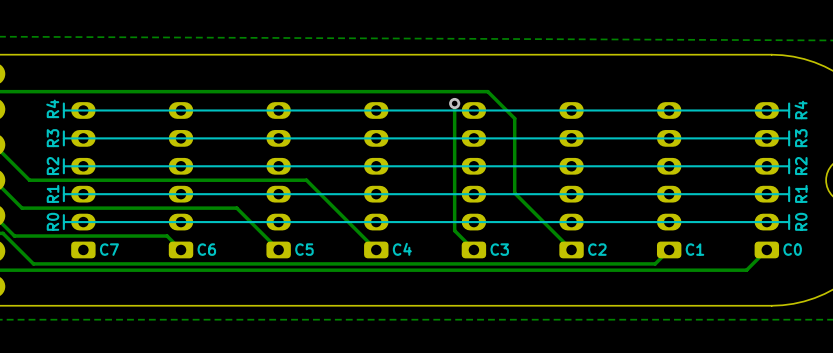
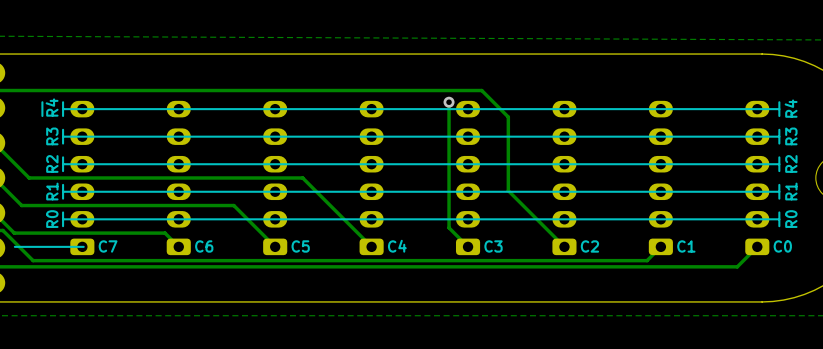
line: none -> (42, 102) (42, 116)
line: none -> (83, 246) (14, 246)

